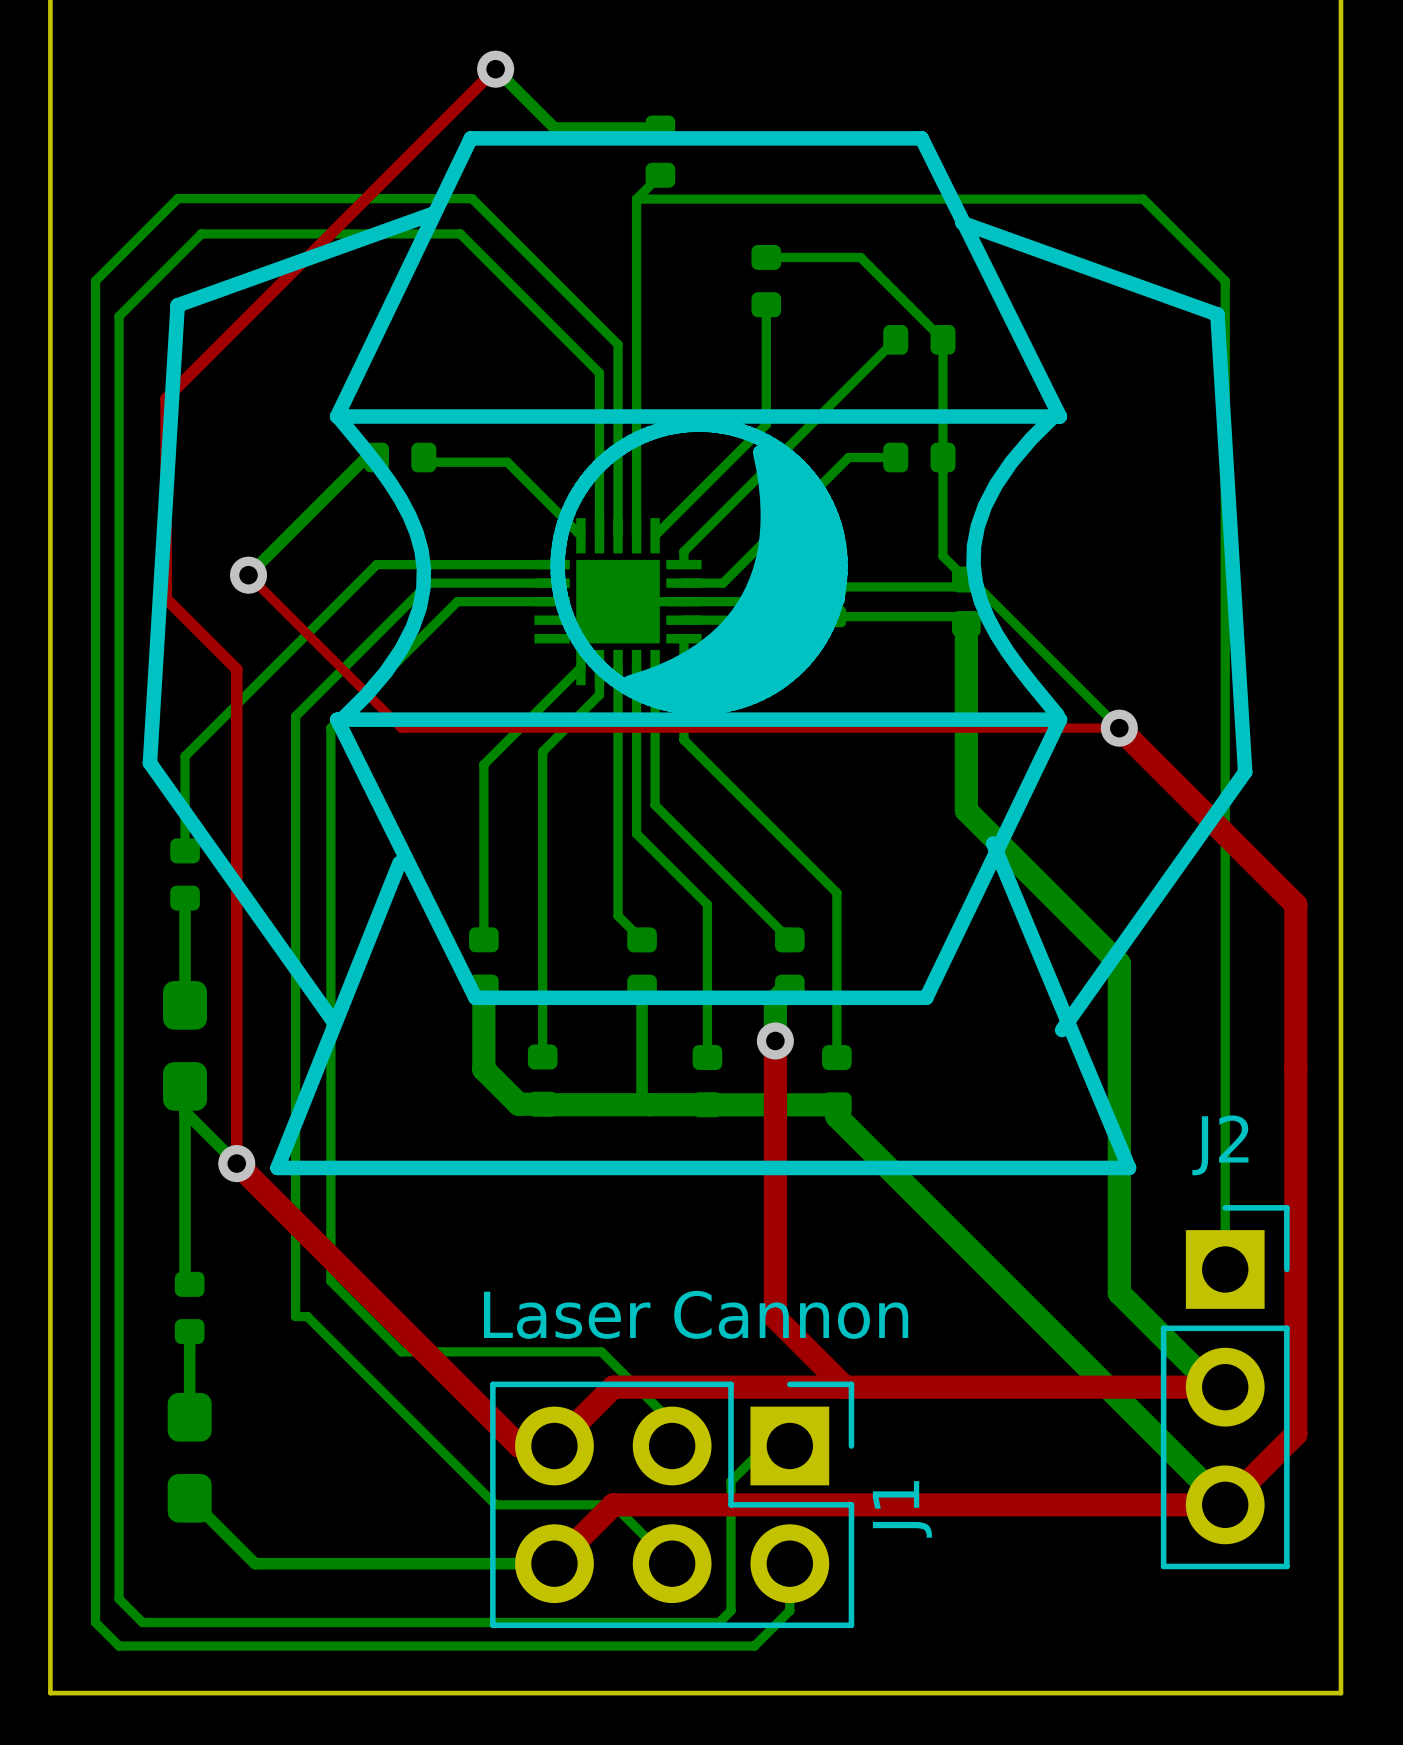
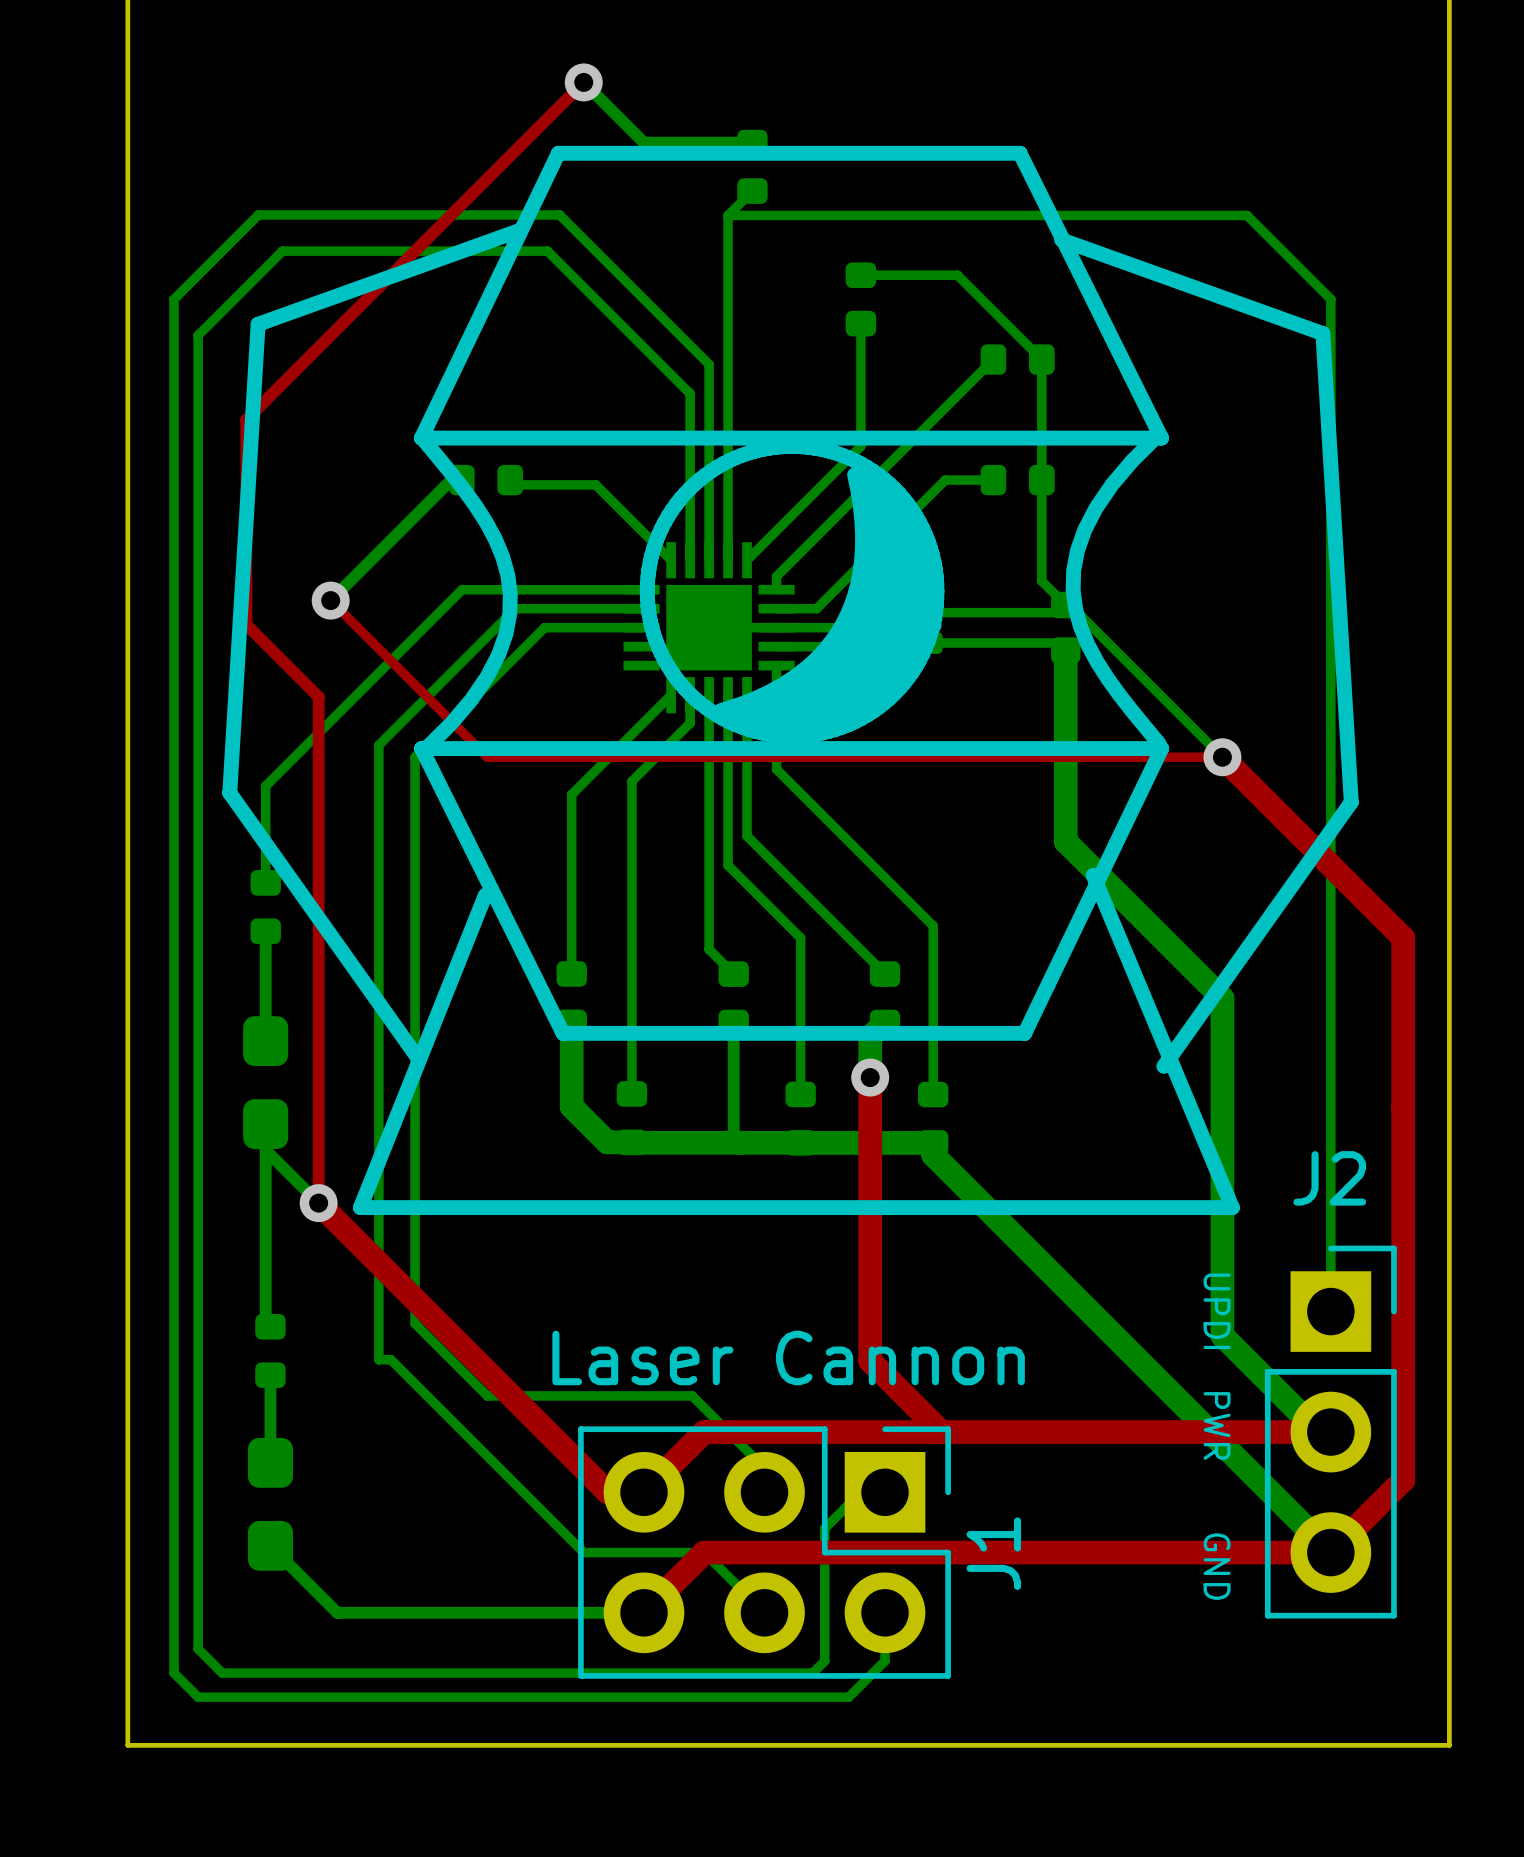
text: none -> UPDI (1217, 1311)
text: none -> PWR (1217, 1425)
text: none -> GND (1217, 1566)

